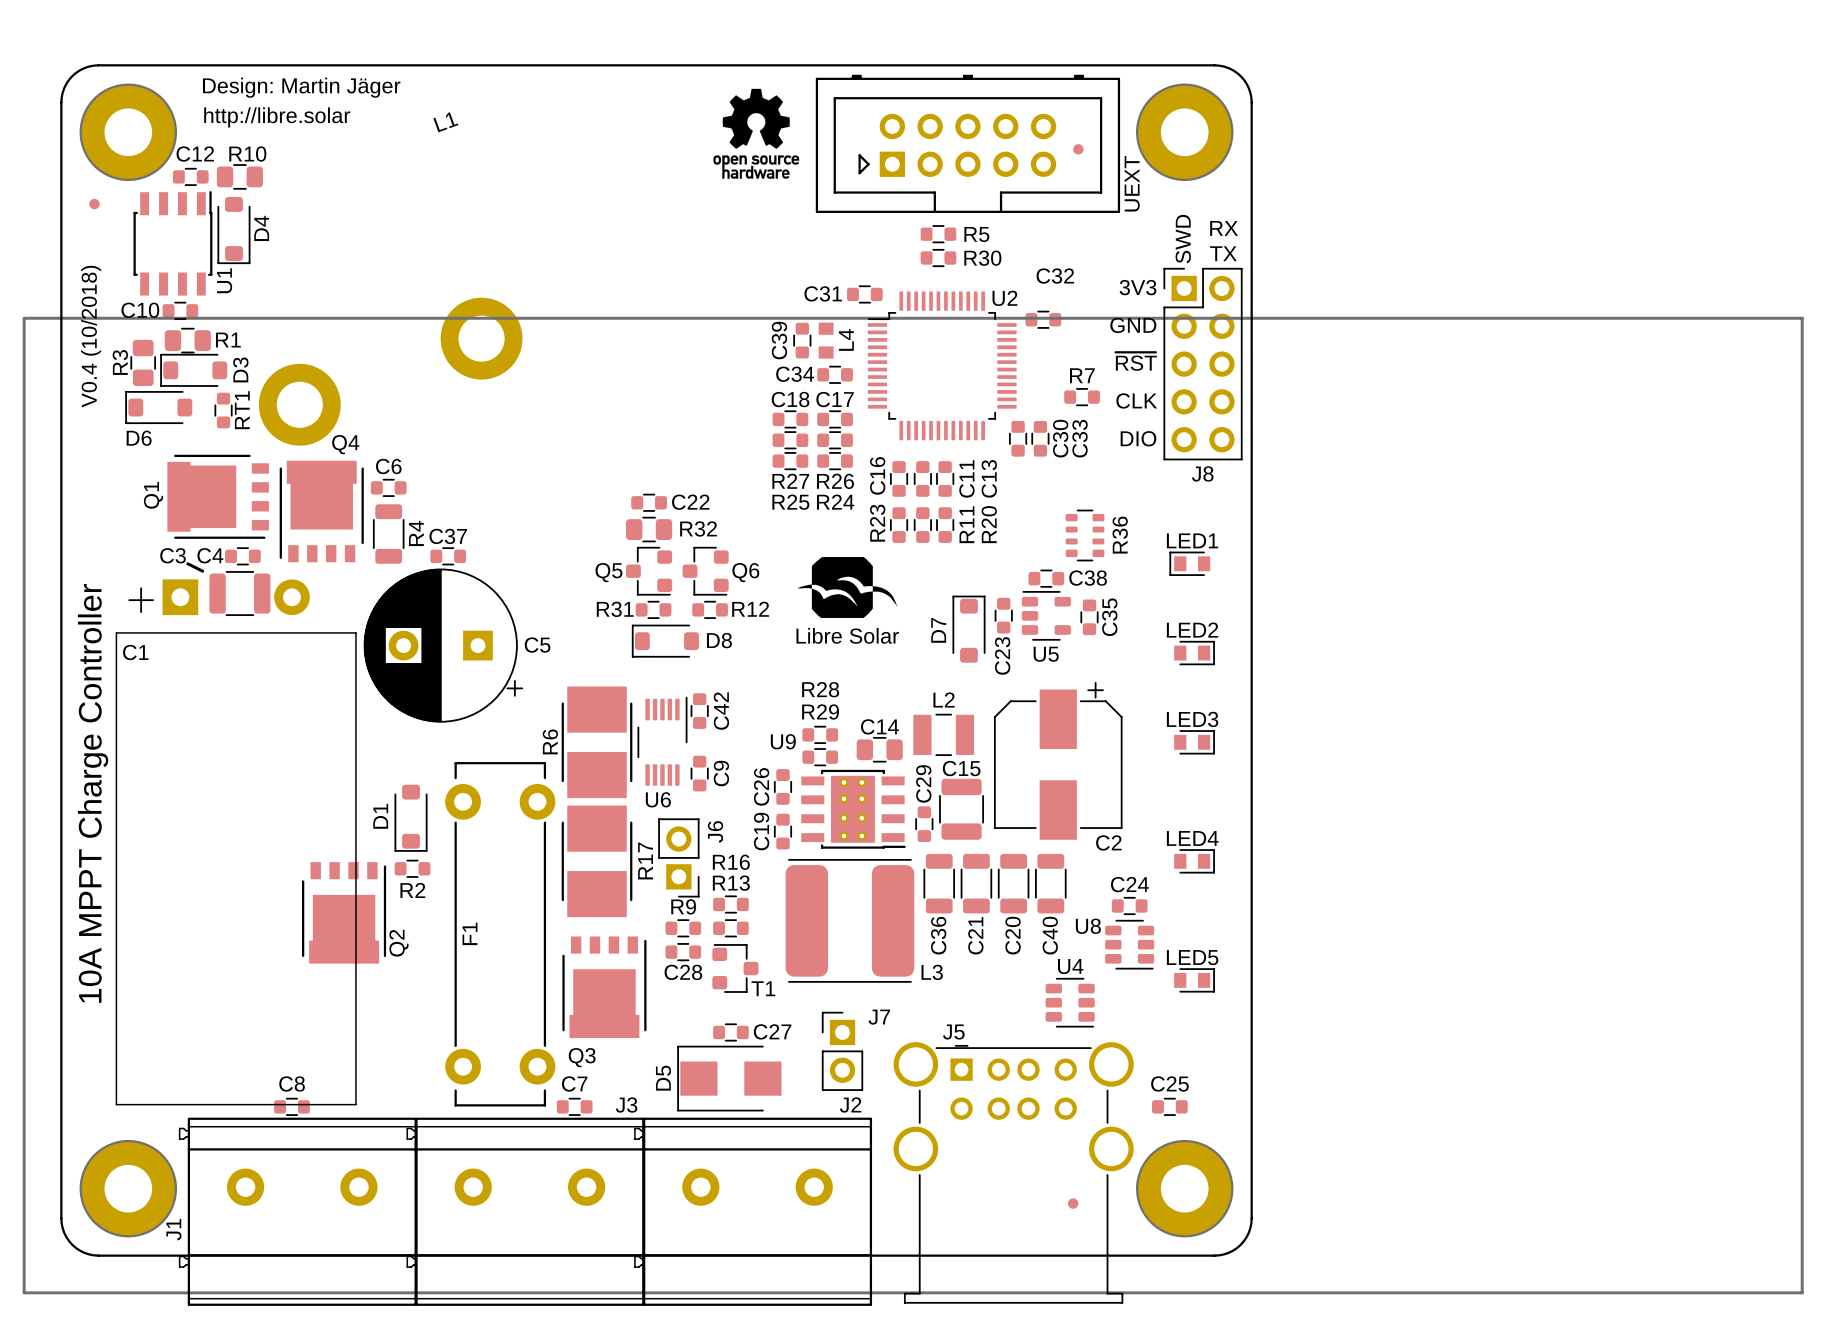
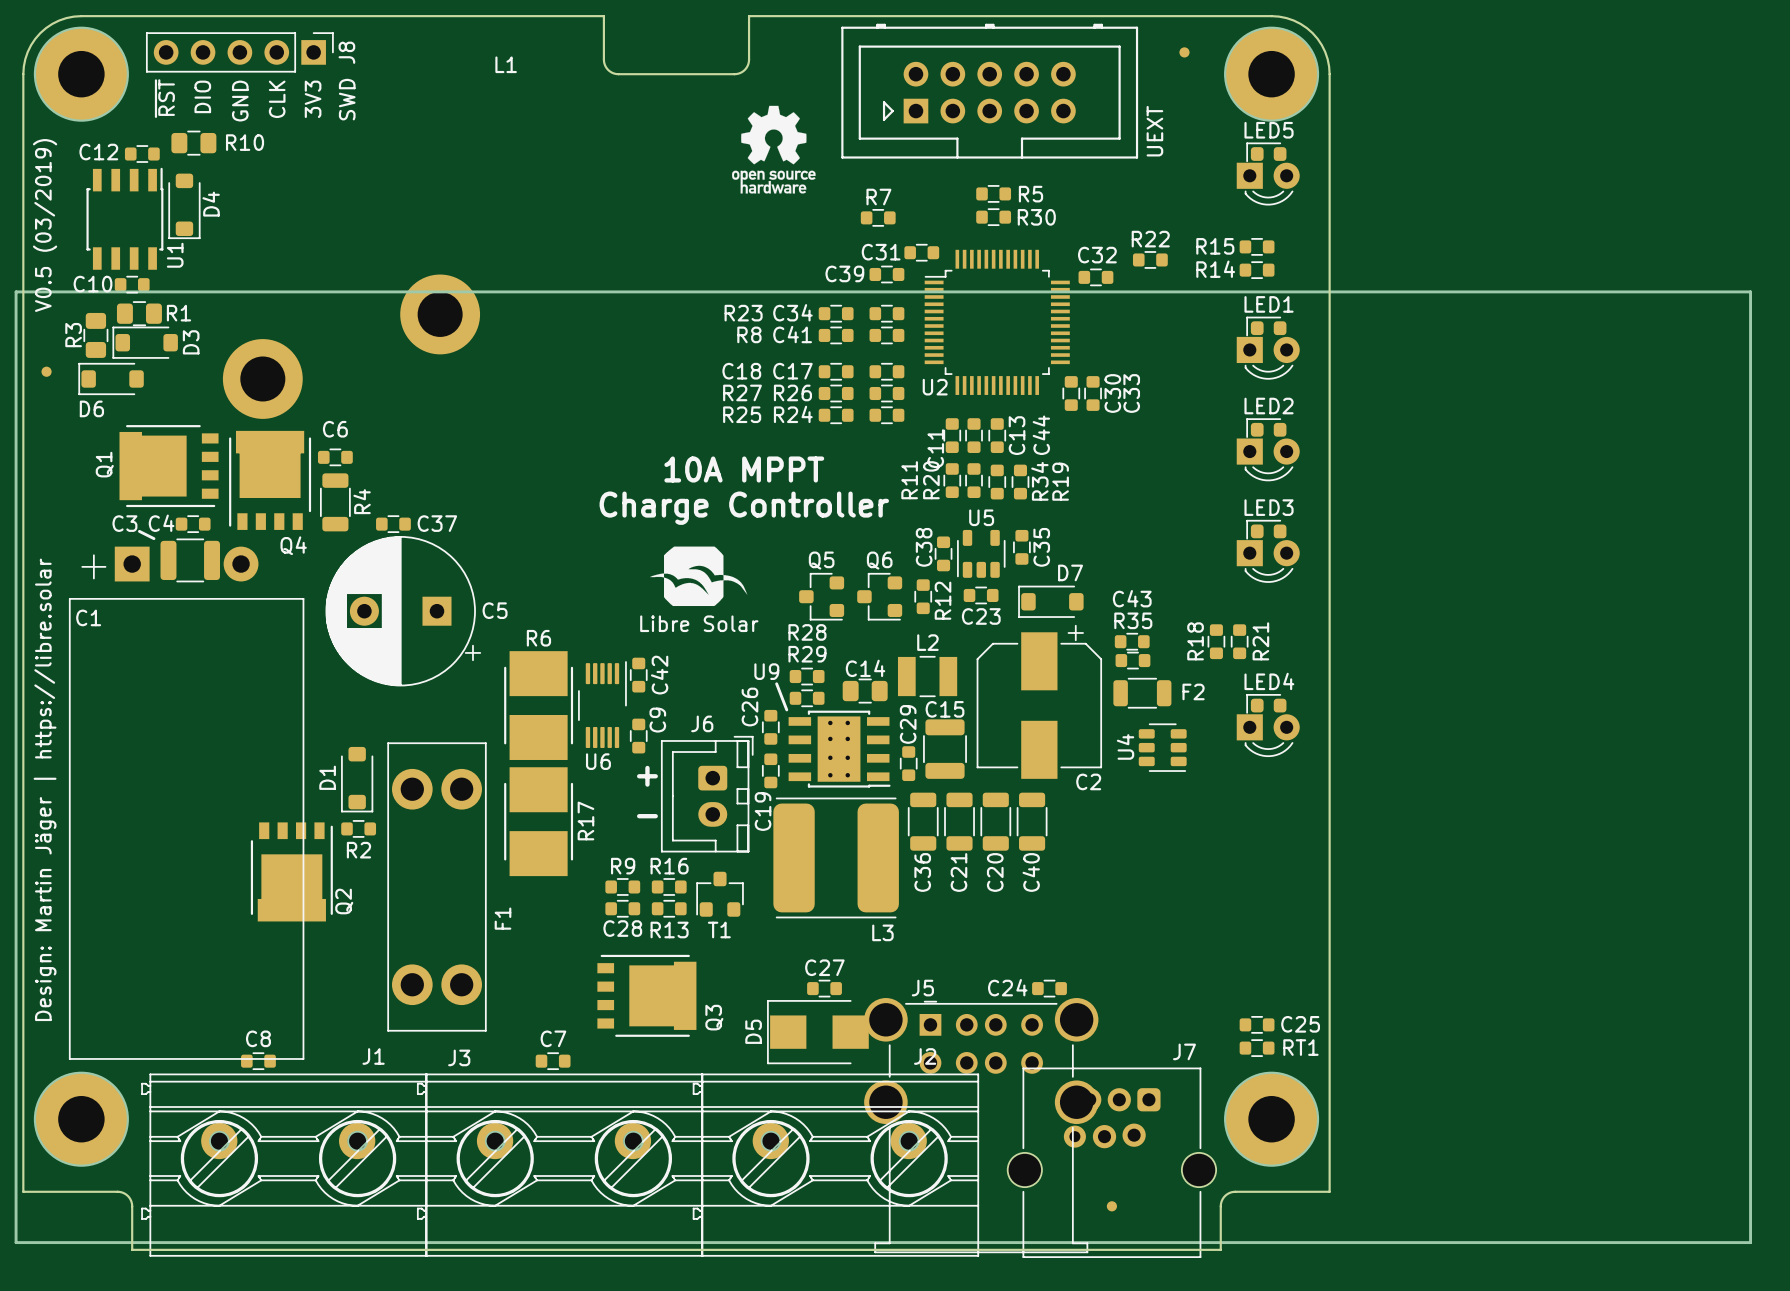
board edge: (98, 65) (1214, 65) (1228, 68) (1240, 76) (1248, 88) (1251, 102) (1251, 1218) (1248, 1232) (1240, 1244) (1228, 1252) (1214, 1255) (98, 1255) (84, 1252) (72, 1244) (64, 1232) (61, 1218) (61, 102) (64, 88) (72, 76) (84, 68) (98, 65) -> (81, 16) (59, 20) (40, 33) (27, 51) (23, 74) (23, 1191) (117, 1191) (124, 1193) (132, 1204) (132, 1249) (1220, 1249) (1220, 1204) (1228, 1193) (1235, 1191) (1329, 1191) (1329, 74) (1325, 51) (1312, 33) (1293, 20) (1271, 16) (749, 16) (748, 61) (746, 68) (740, 73) (618, 74) (609, 71) (604, 63) (603, 16) (81, 16)
text: Design: Martin Jäger (301, 87) -> none
text: none -> DIO (202, 96)
text: http://libre.solar (277, 117) -> none
text: none -> 3V3 (313, 99)
text: none -> ~{RST} (164, 98)
text: none -> CLK (277, 99)
text: none -> SWD (347, 99)
text: none -> GND (240, 101)
L1 name rotation: 0° (445, 122) -> 20° clockwise (506, 64)
L1 name position: L1 (445, 122) -> L1 (506, 64)
part position: (128, 132) -> (81, 74)
part position: (1184, 132) -> (1271, 74)
drawing position: (756, 133) -> (773, 149)
part position: (967, 143) -> (989, 91)
part position: (1078, 149) -> (1184, 52)
C12 name position: C12 (195, 154) -> C12 (98, 152)
R10 name position: R10 (247, 154) -> R10 (245, 142)
C12 position: (190, 176) -> (142, 154)
R10 position: (239, 176) -> (193, 143)
text position: UEXT (1132, 183) -> UEXT (1154, 131)
part position: (94, 204) -> (46, 371)
text: RX (1224, 228) -> none
D4 position: (233, 230) -> (184, 206)
R5 position: (938, 234) -> (993, 193)
text: SWD (1183, 239) -> none
U1 position: (172, 243) -> (124, 218)
text: TX (1223, 253) -> none
R30 position: (938, 258) -> (993, 217)
J8 footprint: [1163, 267, 1243, 461] -> [145, 32, 334, 73]
text: none -> V0.5 (03/2019) (45, 225)
R15: none -> (1257, 246)
C32 name position: C32 (1055, 276) -> C32 (1097, 255)
R22: none -> (1150, 259)
text: 3V3 (1138, 287) -> none
C31 position: (864, 294) -> (921, 252)
R14: none -> (1257, 270)
U2 name position: U2 (1004, 298) -> U2 (935, 387)
C10 position: (180, 310) -> (132, 284)
C32 position: (1043, 319) -> (1095, 277)
text: GND (1133, 325) -> none
text: V0.4 (10/2018) (91, 336) -> none
R1 position: (187, 340) -> (139, 313)
C39 rotation: 0° (802, 340) -> 90° clockwise (886, 274)
C39 position: (802, 340) -> (886, 274)
L4: (826, 340) -> none
text: ~{RST} (1136, 361) -> none
R3 position: (143, 362) -> (95, 335)
R8: none -> (836, 335)
C41: none -> (886, 335)
U2 position: (942, 365) -> (997, 322)
D3 position: (193, 370) -> (145, 342)
L1 position: (390, 371) -> (351, 346)
C34 name position: C34 (795, 374) -> C34 (792, 312)
C34 position: (835, 374) -> (886, 313)
R7 position: (1082, 397) -> (878, 217)
C18 name position: C18 (790, 399) -> C18 (741, 371)
C17 name position: C17 (835, 399) -> C17 (792, 371)
text: CLK (1136, 400) -> none
D6 position: (158, 407) -> (111, 378)
RT1 rotation: 0° (223, 410) -> 90° clockwise (1257, 1048)
RT1 position: (223, 410) -> (1257, 1048)
C18 position: (790, 419) -> (836, 371)
C17 position: (835, 419) -> (886, 371)
C30 position: (1018, 438) -> (1071, 393)
C33 position: (1040, 438) -> (1093, 393)
text: DIO (1138, 438) -> none
R27 position: (790, 440) -> (836, 393)
R26 position: (835, 440) -> (886, 393)
Q4 name position: Q4 (345, 444) -> Q4 (293, 545)
Q1 footprint: [167, 454, 269, 539] -> [119, 425, 219, 508]
Q4 footprint: [279, 460, 364, 563] -> [229, 430, 312, 530]
R25 position: (790, 461) -> (836, 415)
R24 position: (835, 461) -> (886, 415)
C44: none -> (997, 435)
C6 name position: C6 (388, 466) -> C6 (335, 429)
J8 name position: J8 (1202, 473) -> J8 (346, 52)
C16: (899, 478) -> none
C11 position: (922, 478) -> (952, 435)
C13 position: (945, 478) -> (974, 435)
R27 name position: R27 (790, 481) -> R27 (742, 392)
R26 name position: R26 (835, 481) -> R26 (792, 392)
C6 position: (388, 487) -> (335, 457)
text: none -> 10A MPPT (744, 469)
C22: (649, 502) -> none
R25 name position: R25 (790, 502) -> R25 (742, 414)
R24 name position: R24 (835, 502) -> R24 (793, 414)
R34: none -> (997, 482)
R19: none -> (1020, 482)
R23 name position: R23 (877, 523) -> R23 (743, 313)
R11 name position: R11 (966, 524) -> R11 (909, 480)
R20 name position: R20 (989, 524) -> R20 (931, 480)
R23 rotation: 0° (899, 525) -> 90° clockwise (836, 313)
R23 position: (899, 525) -> (836, 313)
R11 position: (922, 525) -> (952, 480)
R20 position: (945, 525) -> (974, 480)
R32: (649, 529) -> none
R4 position: (388, 534) -> (335, 502)
R36: (1085, 535) -> none
C37 name position: C37 (448, 536) -> C37 (437, 523)
text: none -> Charge Controller (744, 508)
LED1 footprint: [1169, 551, 1211, 576] -> [1236, 316, 1300, 380]
C4 position: (242, 556) -> (193, 524)
C37 position: (448, 556) -> (393, 524)
line: (187, 563) (202, 571) -> (139, 531) (153, 538)
Q5 position: (649, 571) -> (821, 596)
Q6 position: (705, 571) -> (879, 596)
Q5 name position: Q5 (608, 572) -> Q5 (821, 560)
Q6 name position: Q6 (745, 572) -> Q6 (879, 560)
C38 rotation: 0° (1046, 578) -> 90° clockwise (943, 553)
C38 position: (1046, 578) -> (943, 553)
C38 name position: C38 (1088, 578) -> C38 (924, 547)
drawing position: (847, 587) -> (698, 576)
C3 position: (239, 593) -> (190, 560)
R31: (653, 609) -> none
R12 rotation: 0° (710, 609) -> 90° clockwise (923, 596)
R12 position: (710, 609) -> (923, 596)
C23 rotation: 0° (1003, 615) -> 90° clockwise (981, 595)
U5 rotation: 0° (1046, 615) -> 90° counterclockwise (981, 553)
U5 position: (1046, 615) -> (981, 553)
C35 position: (1089, 617) -> (1021, 547)
D7 rotation: 0° (968, 629) -> 90° counterclockwise (1050, 601)
D7 position: (968, 629) -> (1050, 601)
D7 name position: D7 (938, 630) -> D7 (1070, 572)
LED2 footprint: [1174, 640, 1215, 666] -> [1236, 418, 1300, 482]
D8: (665, 641) -> none
C5 position: (443, 645) -> (403, 611)
U5 name position: U5 (1046, 654) -> U5 (981, 517)
C43: none -> (1132, 641)
R18: none -> (1216, 641)
R21: none -> (1239, 641)
R35: none -> (1132, 660)
C42 position: (699, 711) -> (638, 675)
line: none -> (776, 683) (786, 709)
F2: none -> (1142, 693)
LED3 footprint: [1174, 730, 1215, 755] -> [1236, 519, 1300, 583]
R28 position: (820, 734) -> (807, 676)
L2 position: (943, 734) -> (927, 676)
R6 name rotation: 0° (550, 741) -> 90° clockwise (538, 638)
R6 name position: R6 (550, 741) -> R6 (538, 638)
U6 position: (662, 741) -> (602, 704)
U9 name position: U9 (783, 741) -> U9 (766, 671)
R6 position: (597, 742) -> (538, 705)
C14 position: (879, 749) -> (865, 691)
R29 position: (820, 757) -> (807, 698)
C2 position: (1058, 760) -> (1039, 701)
F1 footprint: [445, 762, 556, 1107] -> [387, 742, 487, 1032]
C9 position: (699, 773) -> (638, 736)
C9 name position: C9 (721, 773) -> C9 (657, 720)
C26 name position: C26 (761, 786) -> C26 (749, 707)
C26 position: (782, 786) -> (770, 727)
text: 10A MPPT Charge Controller (93, 793) -> none
U9 position: (853, 809) -> (839, 749)
C15 position: (961, 809) -> (945, 749)
text: none -> + (647, 776)
D1 position: (411, 818) -> (357, 779)
J6 footprint: [658, 818, 700, 898] -> [660, 735, 754, 853]
C29 position: (924, 824) -> (908, 763)
J6 name position: J6 (715, 831) -> J6 (702, 723)
C19 name position: C19 (761, 831) -> C19 (763, 811)
C19 position: (782, 831) -> (770, 770)
C1 position: (236, 842) -> (186, 803)
LED4 footprint: [1174, 849, 1215, 874] -> [1236, 694, 1300, 758]
text: none -> - (647, 816)
R17 position: (597, 861) -> (538, 821)
Q2 footprint: [302, 862, 387, 964] -> [250, 822, 333, 922]
R16 name position: R16 (731, 862) -> R16 (669, 866)
R2 position: (412, 868) -> (358, 828)
text: none -> Design: Martin Jäger | https://libre.solar (45, 789)
R13 name position: R13 (731, 883) -> R13 (669, 929)
C36 position: (939, 883) -> (923, 821)
C21 position: (976, 883) -> (959, 821)
C20 position: (1013, 883) -> (995, 821)
C40 position: (1050, 883) -> (1032, 821)
C24 name position: C24 (1129, 884) -> C24 (1007, 987)
R16 position: (730, 904) -> (669, 886)
C24 position: (1129, 905) -> (1049, 988)
L3 position: (849, 920) -> (836, 857)
R9 position: (683, 928) -> (622, 886)
R13 position: (730, 928) -> (669, 908)
F1 name position: F1 (469, 933) -> F1 (503, 918)
Q3 footprint: [562, 936, 647, 1039] -> [597, 954, 697, 1037]
U8: (1129, 944) -> none
C28 position: (683, 952) -> (622, 908)
U4 name rotation: 0° (1070, 966) -> 90° counterclockwise (1125, 746)
U4 name position: U4 (1070, 966) -> U4 (1125, 746)
T1 rotation: 0° (735, 968) -> 90° counterclockwise (720, 894)
T1 position: (735, 968) -> (720, 894)
LED5 footprint: [1174, 968, 1215, 993] -> [1236, 142, 1300, 206]
L3 name position: L3 (932, 972) -> L3 (882, 932)
T1 name position: T1 (763, 988) -> T1 (719, 929)
U4 position: (1070, 1002) -> (1162, 747)
J7 footprint: [821, 1011, 864, 1091] -> [1007, 1067, 1217, 1258]
J7 name position: J7 (879, 1017) -> J7 (1184, 1051)
C27 name position: C27 (772, 1031) -> C27 (824, 967)
C27 position: (730, 1032) -> (824, 988)
Q3 name position: Q3 (582, 1057) -> Q3 (714, 1017)
D5 position: (729, 1078) -> (817, 1032)
C25 name position: C25 (1169, 1083) -> C25 (1300, 1024)
J3 name position: J3 (626, 1105) -> J3 (459, 1057)
C8 position: (291, 1106) -> (258, 1061)
C25 position: (1169, 1106) -> (1257, 1024)
J1 footprint: [178, 1117, 417, 1306] -> [141, 1073, 428, 1257]
J3 footprint: [406, 1117, 645, 1306] -> [417, 1073, 704, 1257]
J2 footprint: [634, 1117, 873, 1306] -> [692, 1073, 979, 1257]
part position: (128, 1188) -> (81, 1119)
part position: (1184, 1188) -> (1271, 1119)
part position: (1073, 1203) -> (1111, 1206)
J1 name position: J1 (173, 1229) -> J1 (373, 1056)

